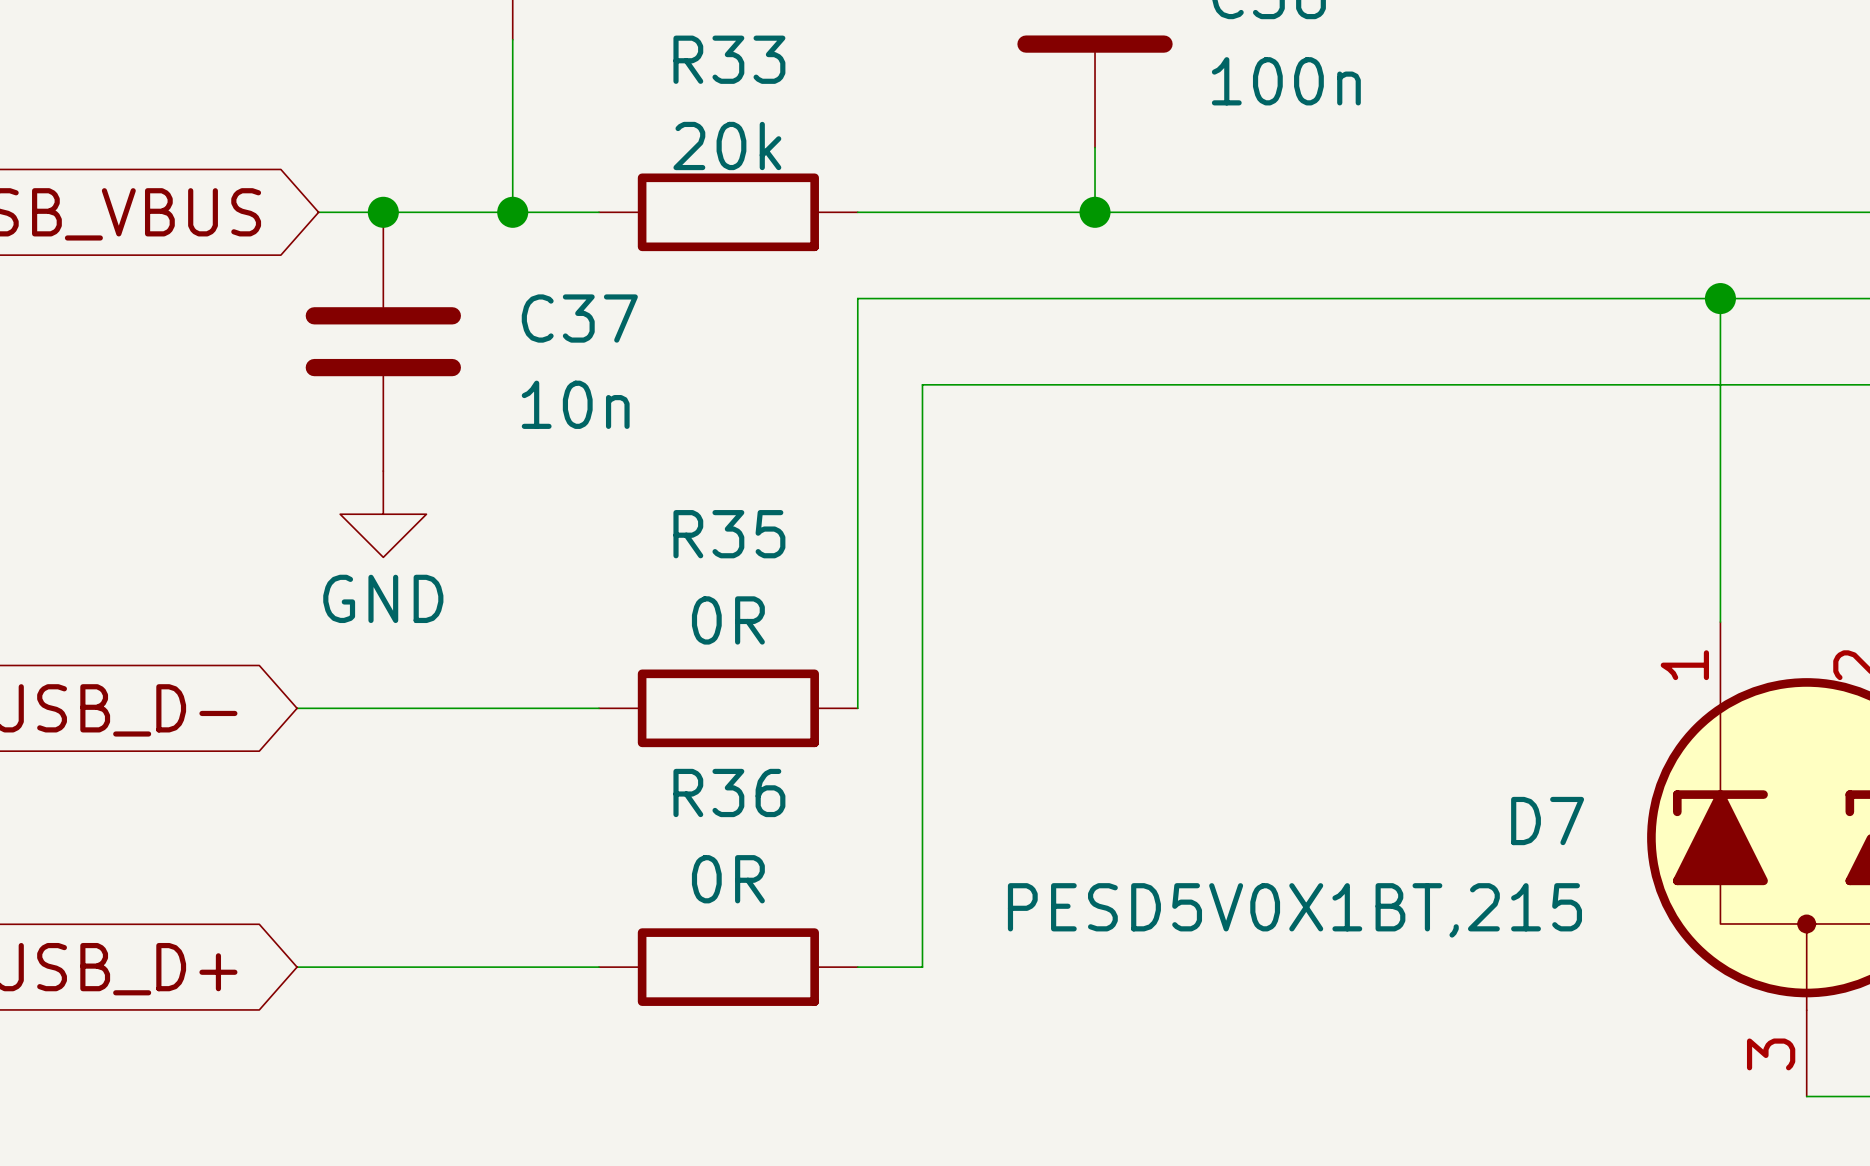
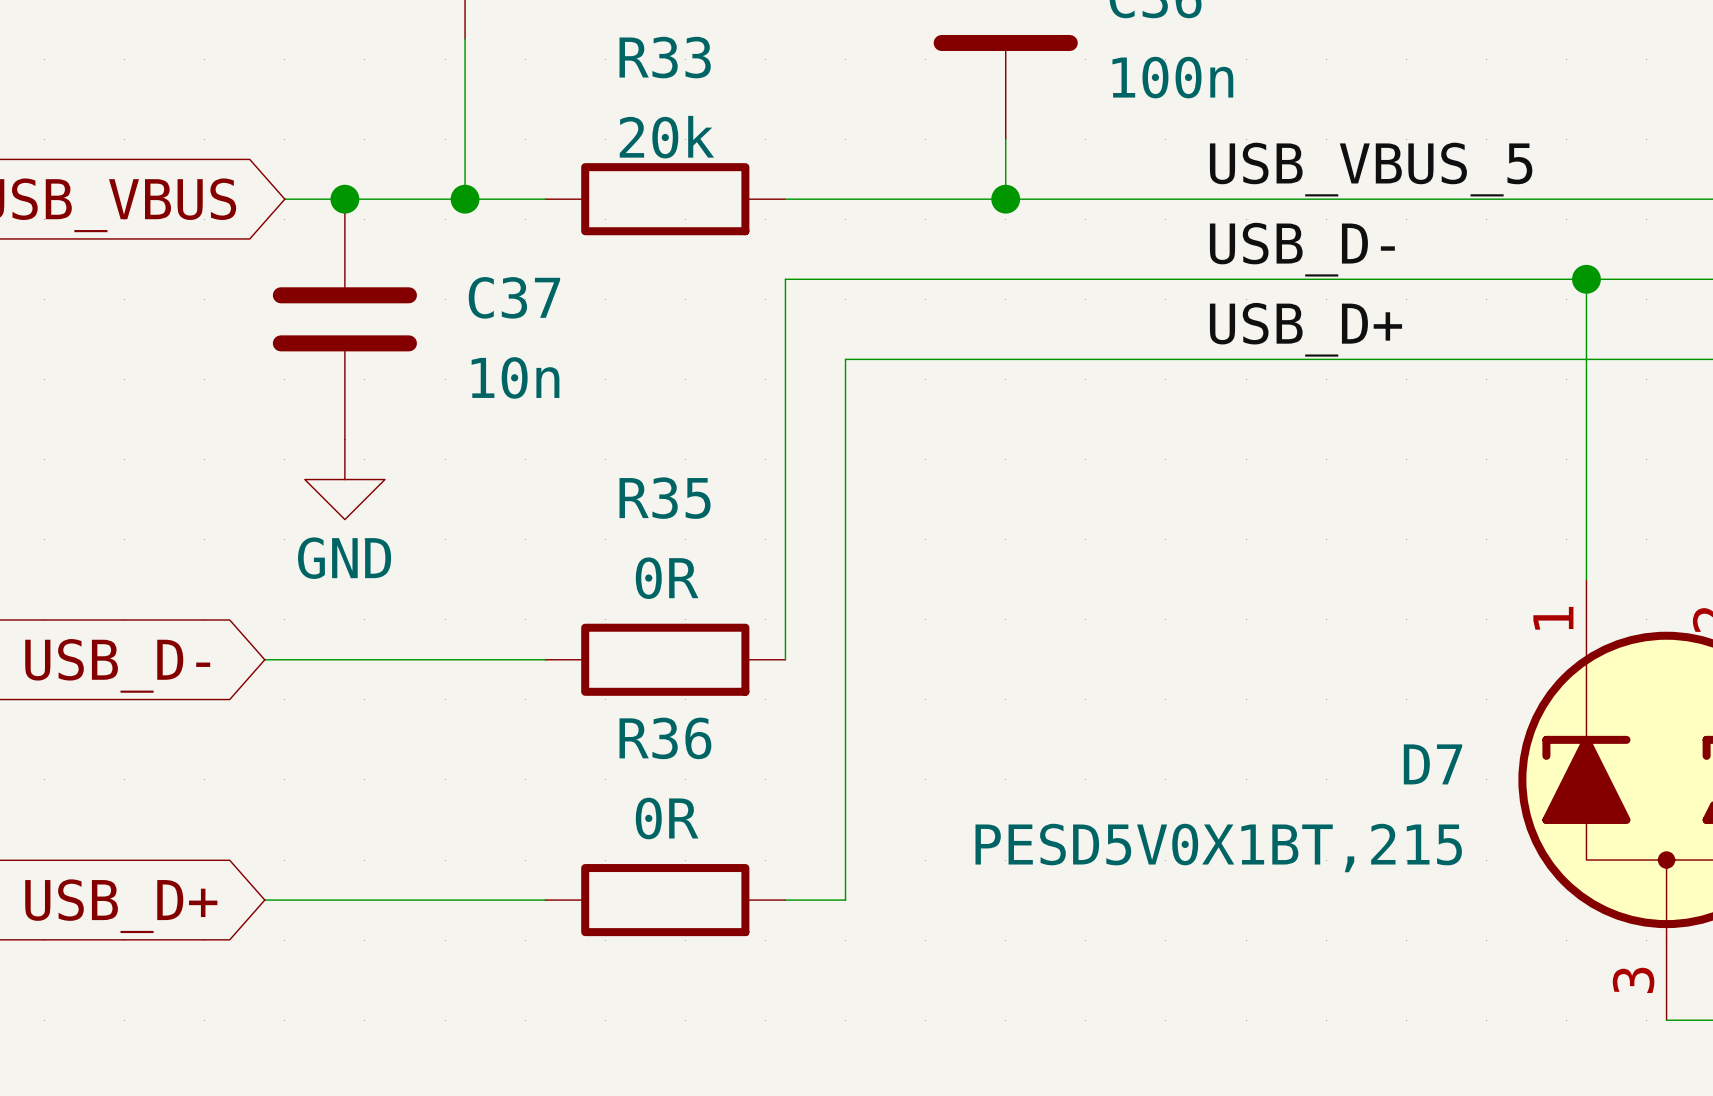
label: none -> USB_VBUS_5 (1371, 169)
label: none -> USB_D- (1302, 249)
label: none -> USB_D+ (1305, 329)

